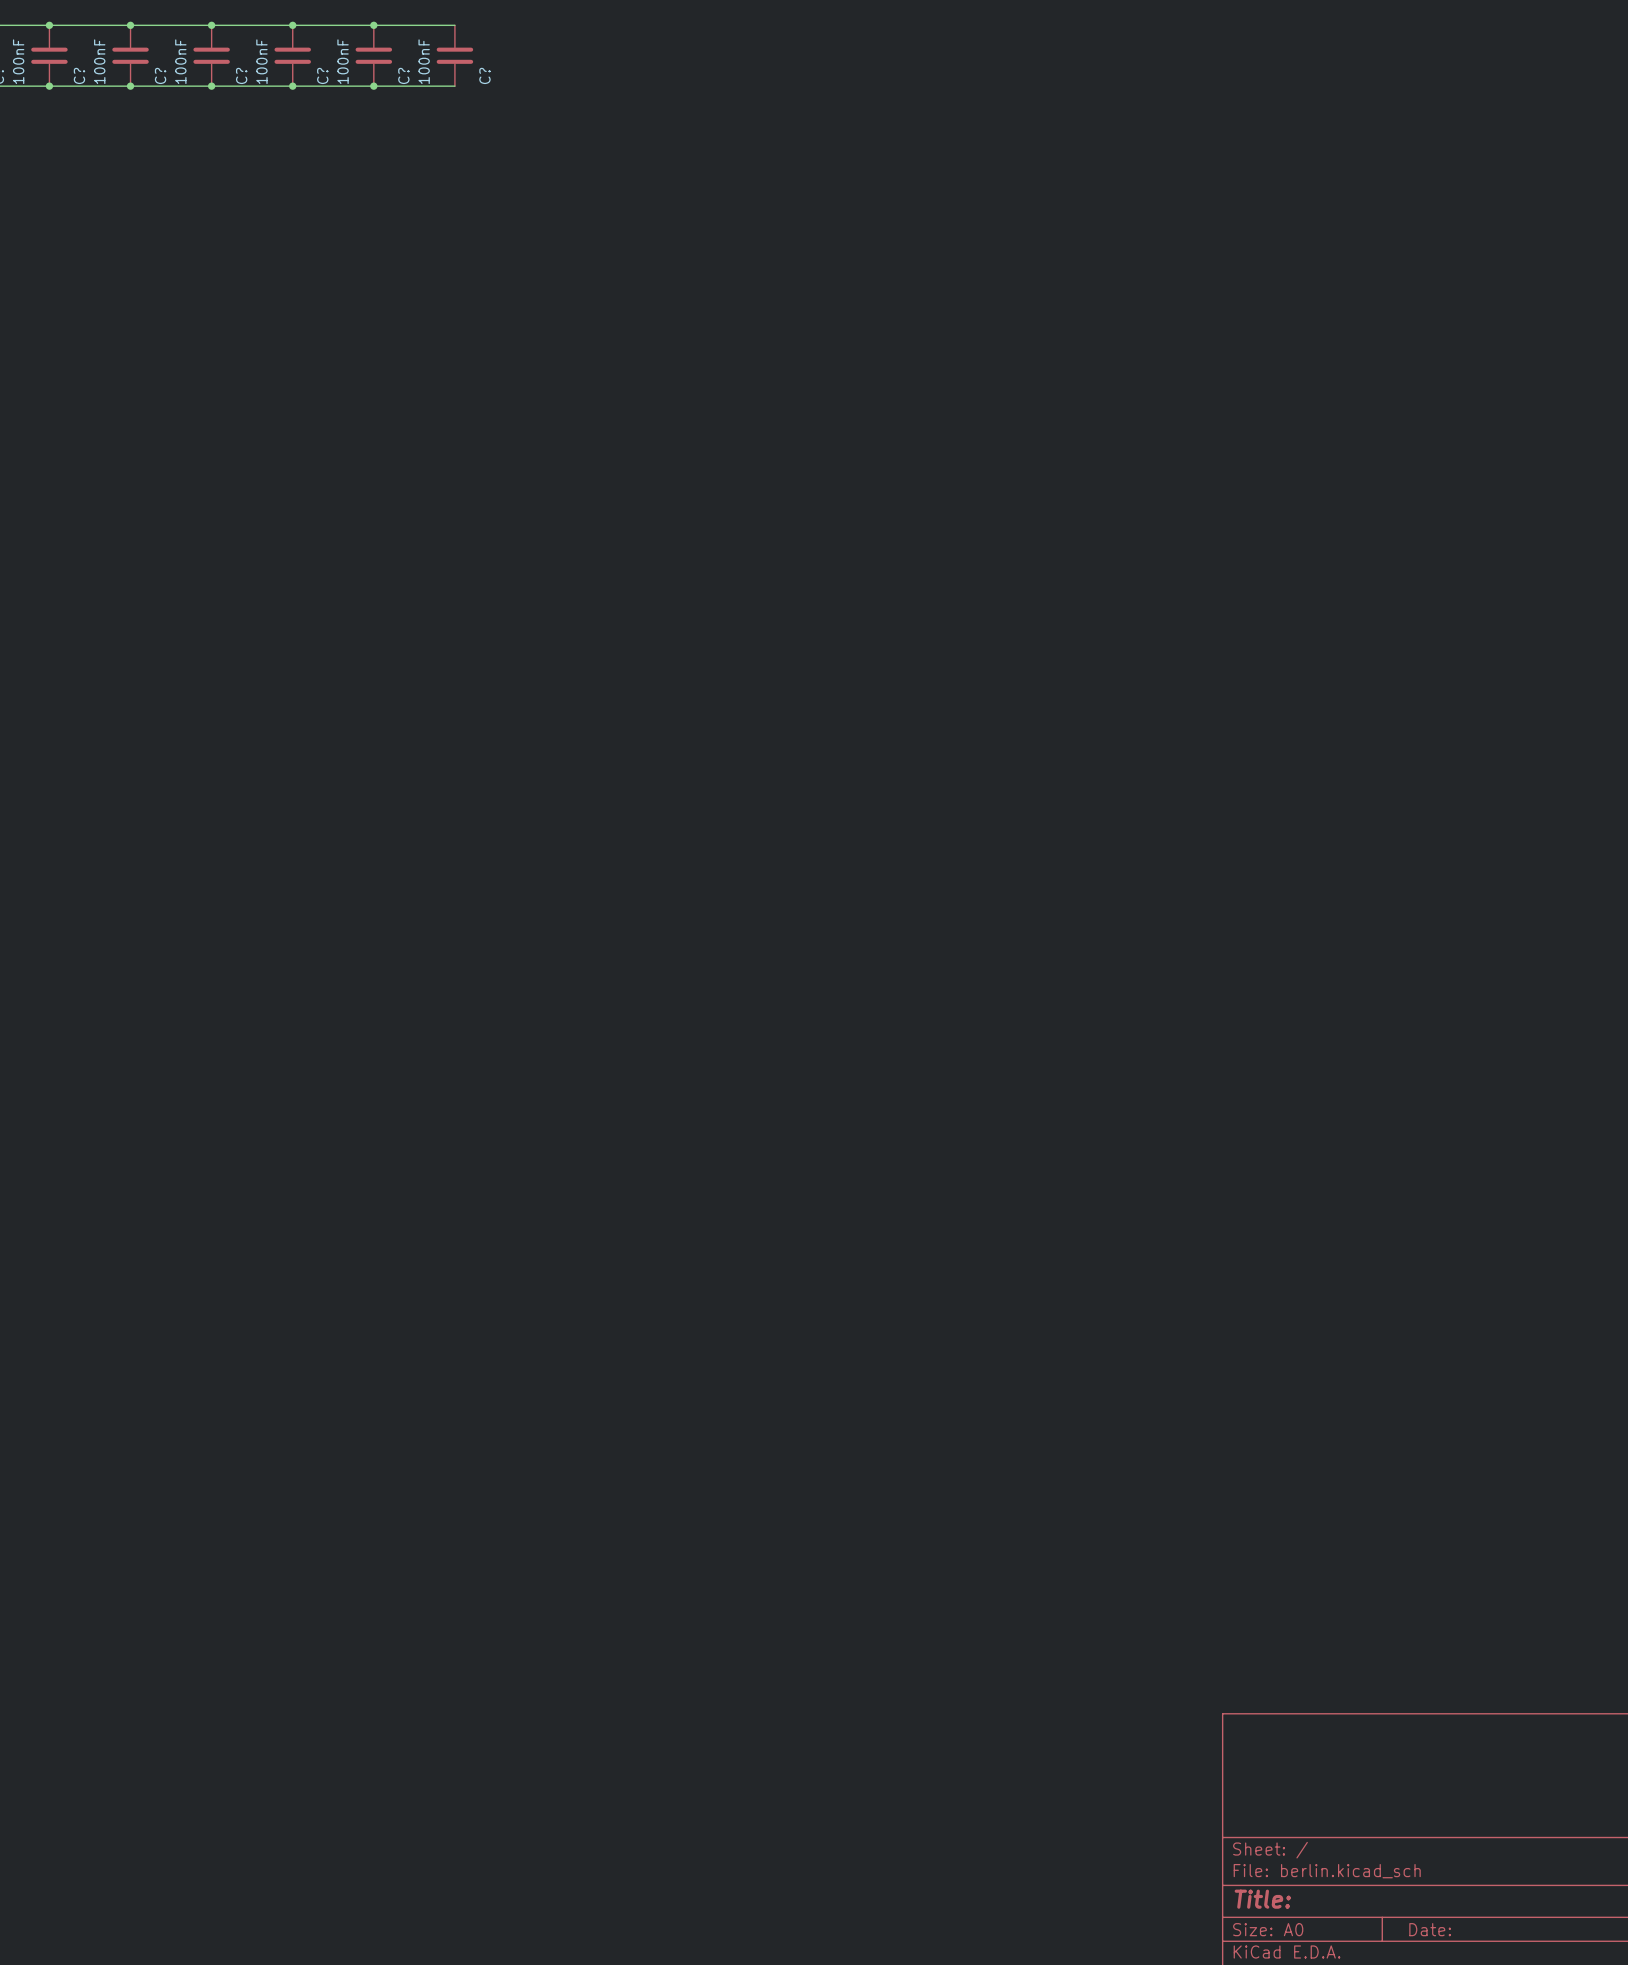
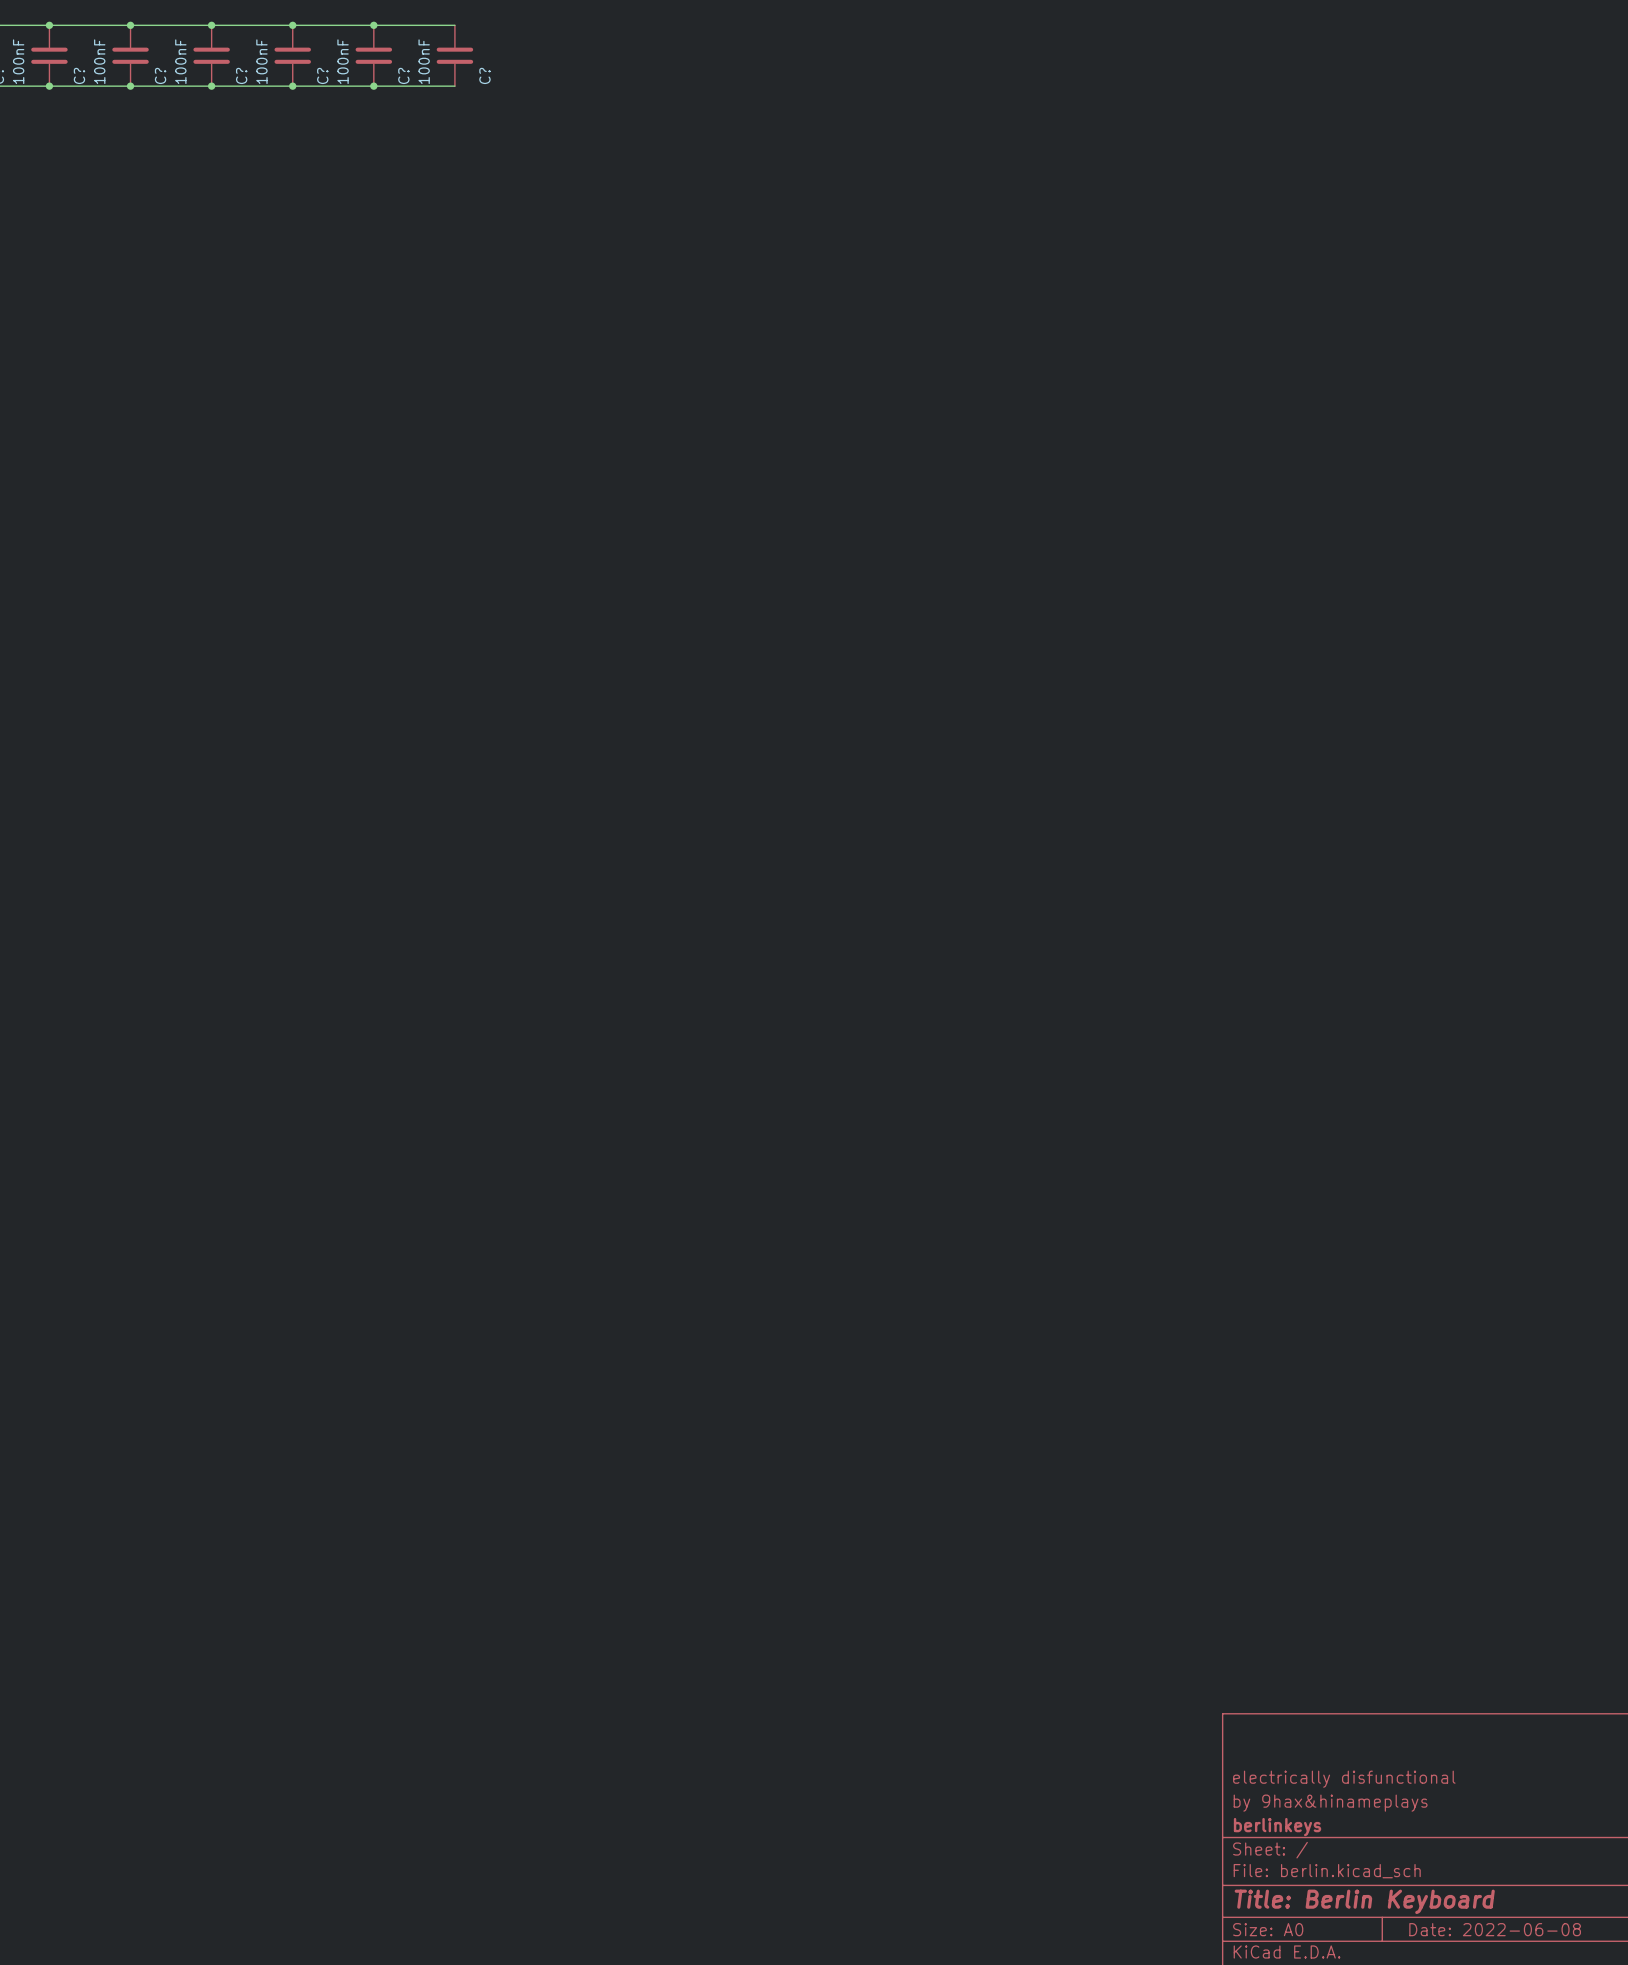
title block: none -> electrically disfunctional (1344, 1779)
title block: none -> by 9hax&hinameplays (1330, 1803)
title block: none -> berlinkeys (1277, 1827)
title block: Title: (1262, 1899) -> Title: Berlin Keyboard (1364, 1901)
title block: Date: (1430, 1929) -> Date: 2022-06-08 (1495, 1929)

